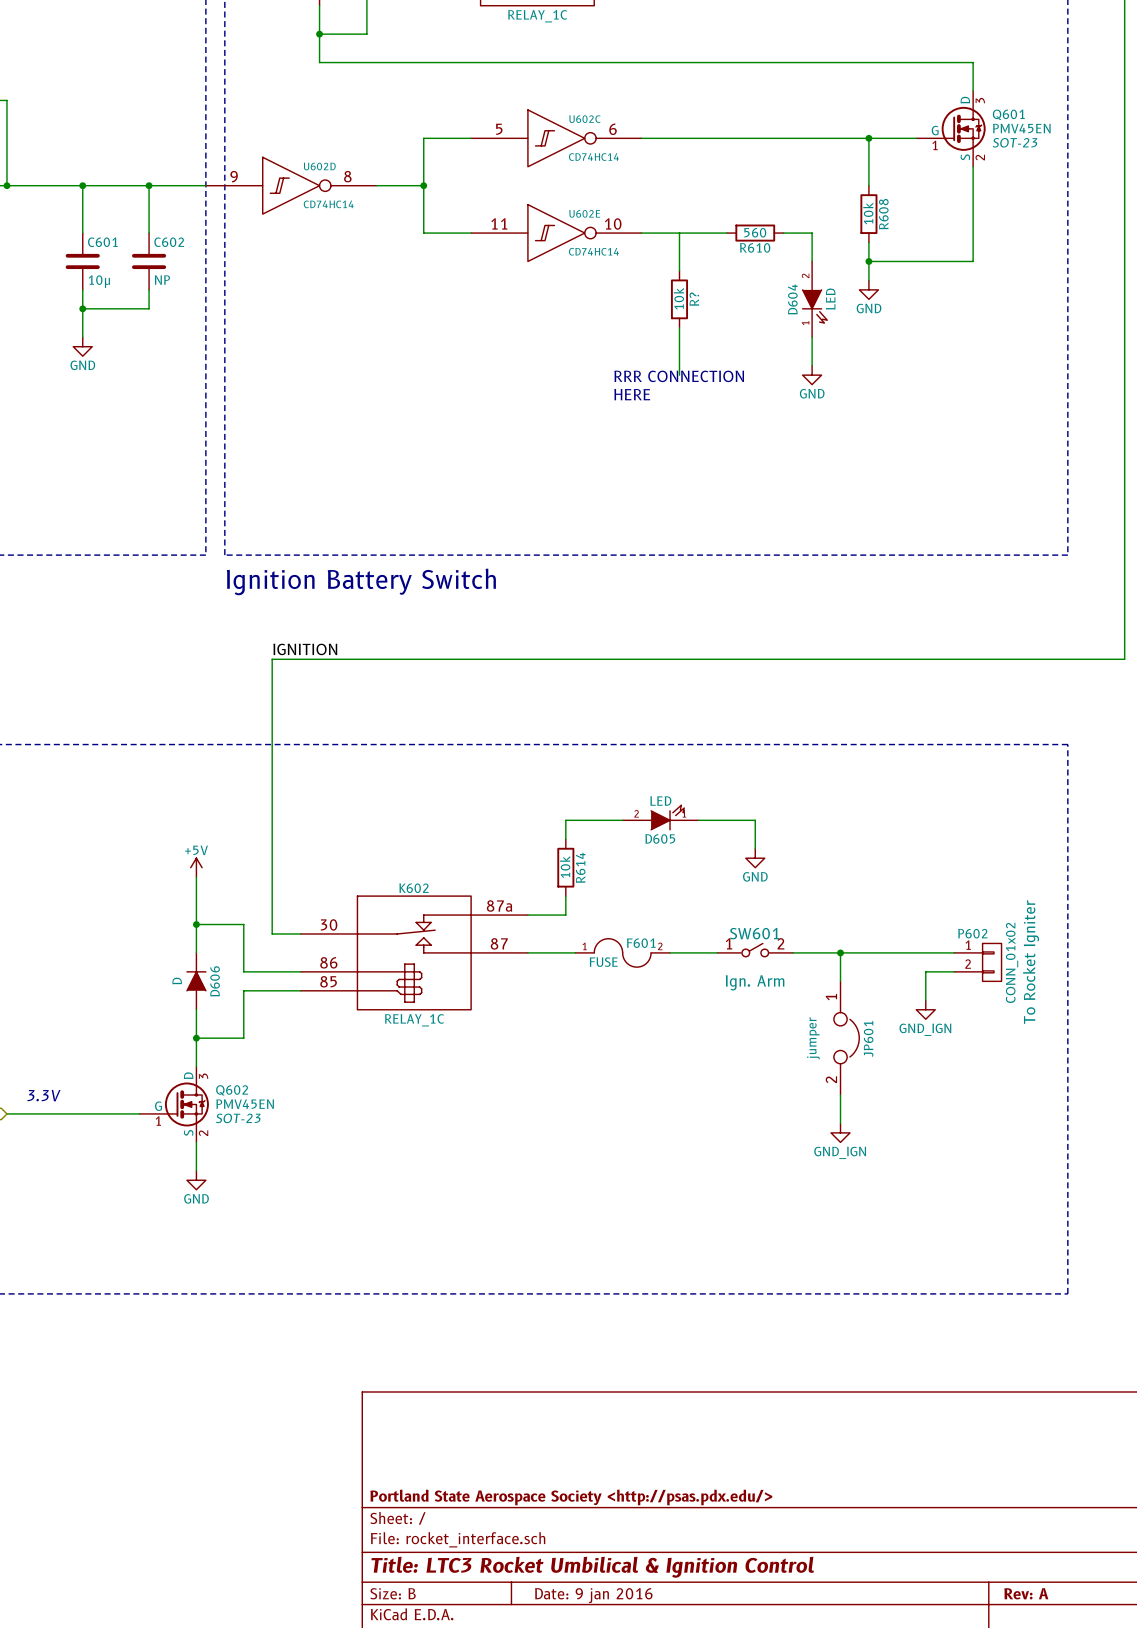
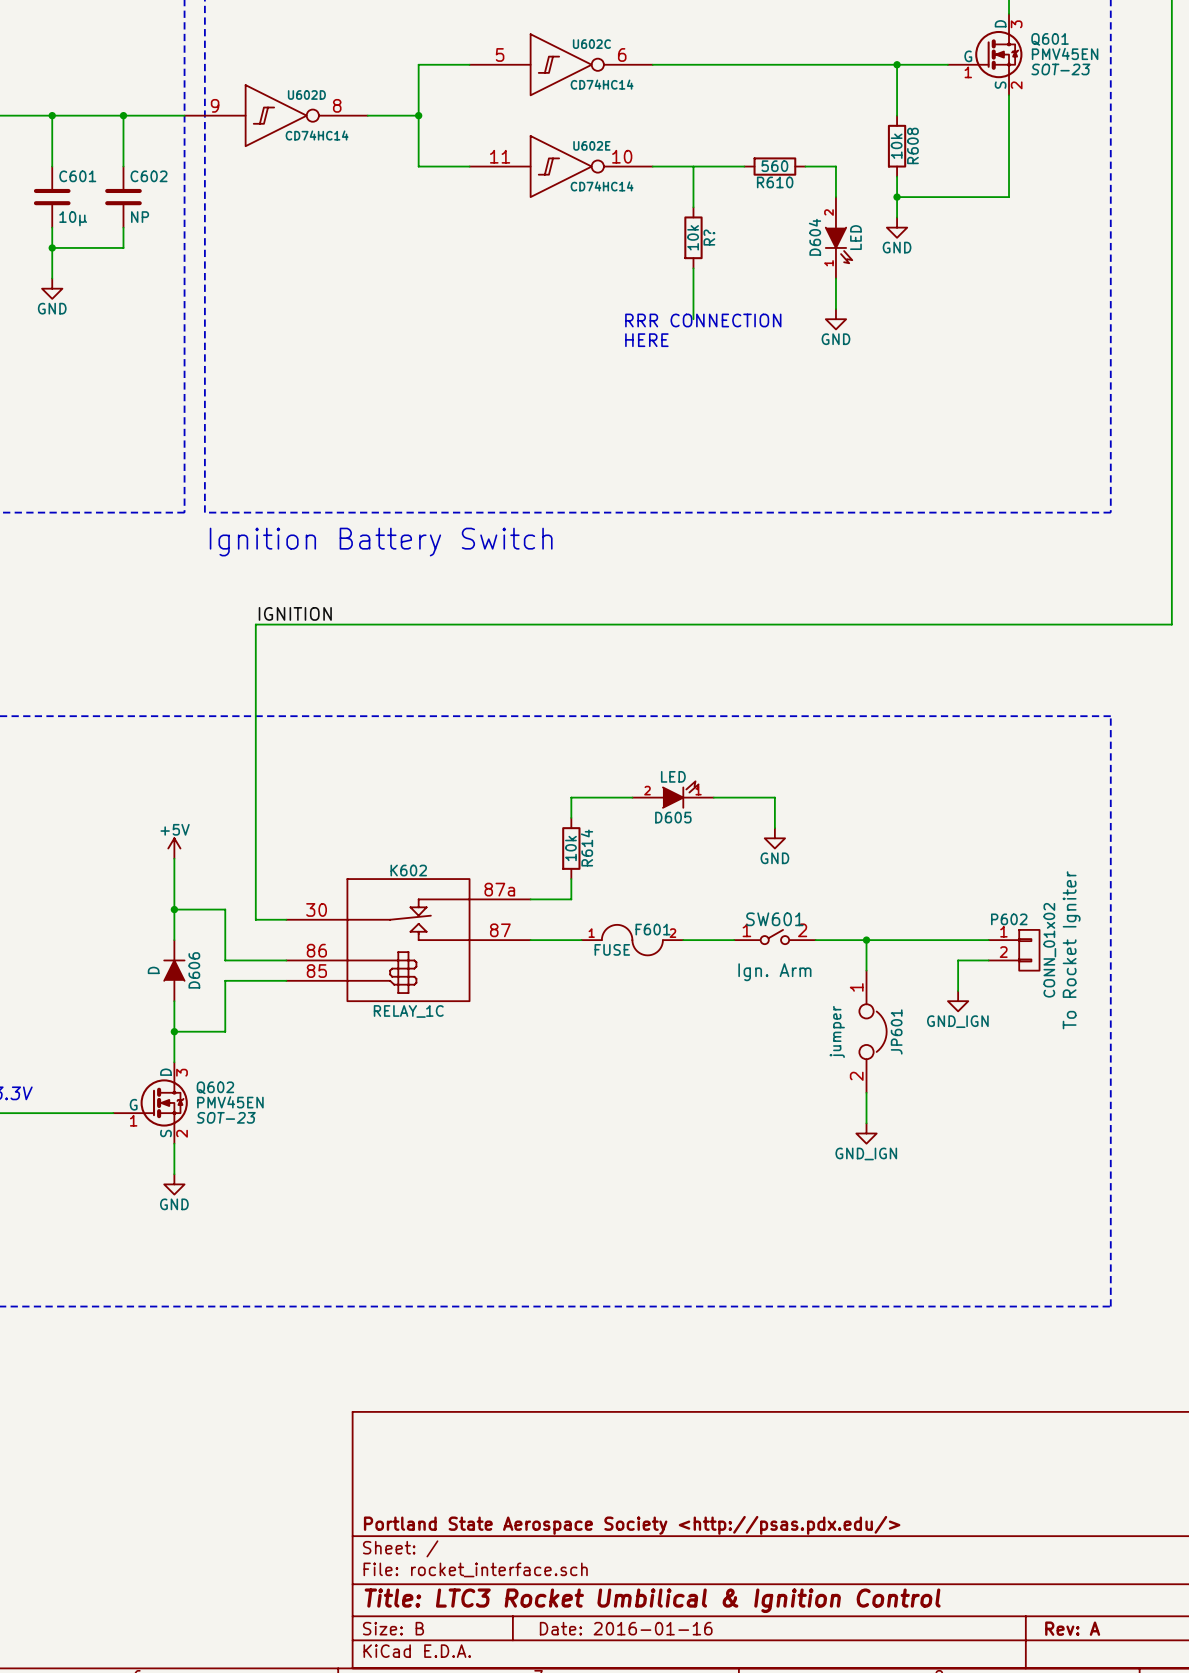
title block: Date: 9 jan 2016 (593, 1595) -> Date: 2016-01-16 (626, 1628)

